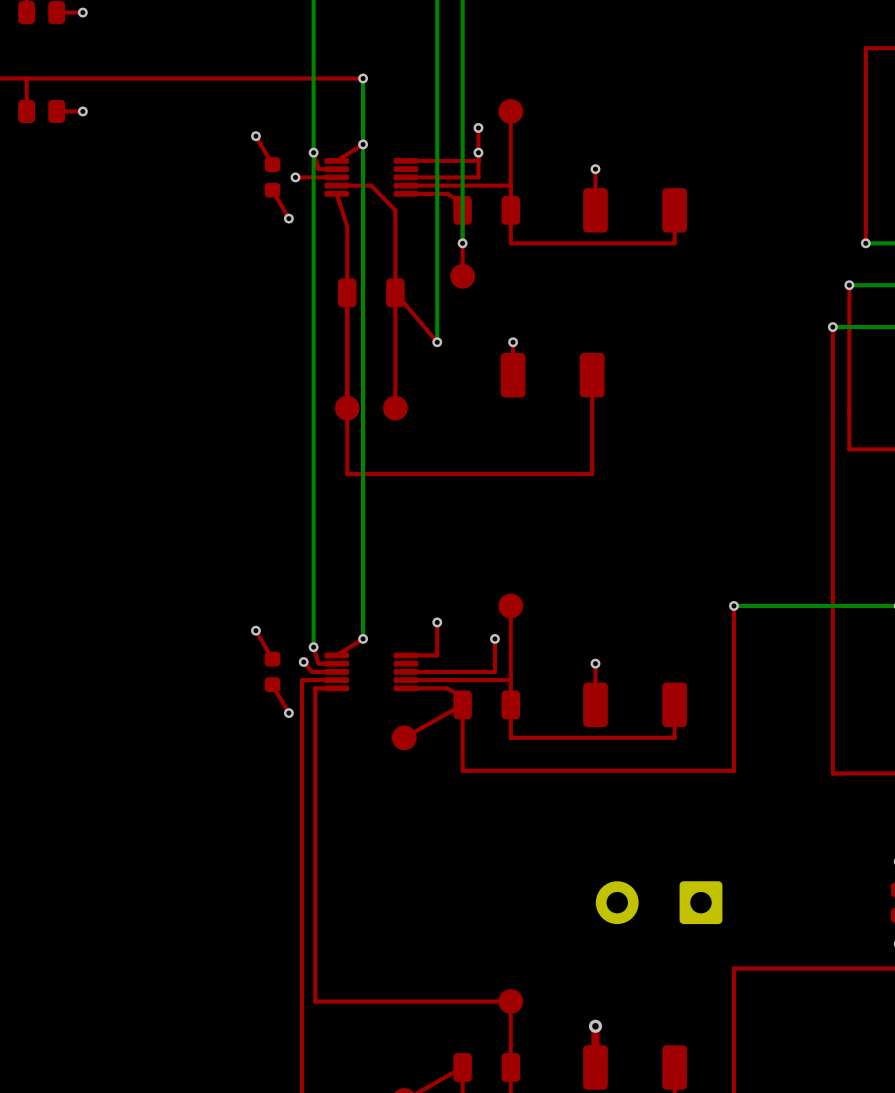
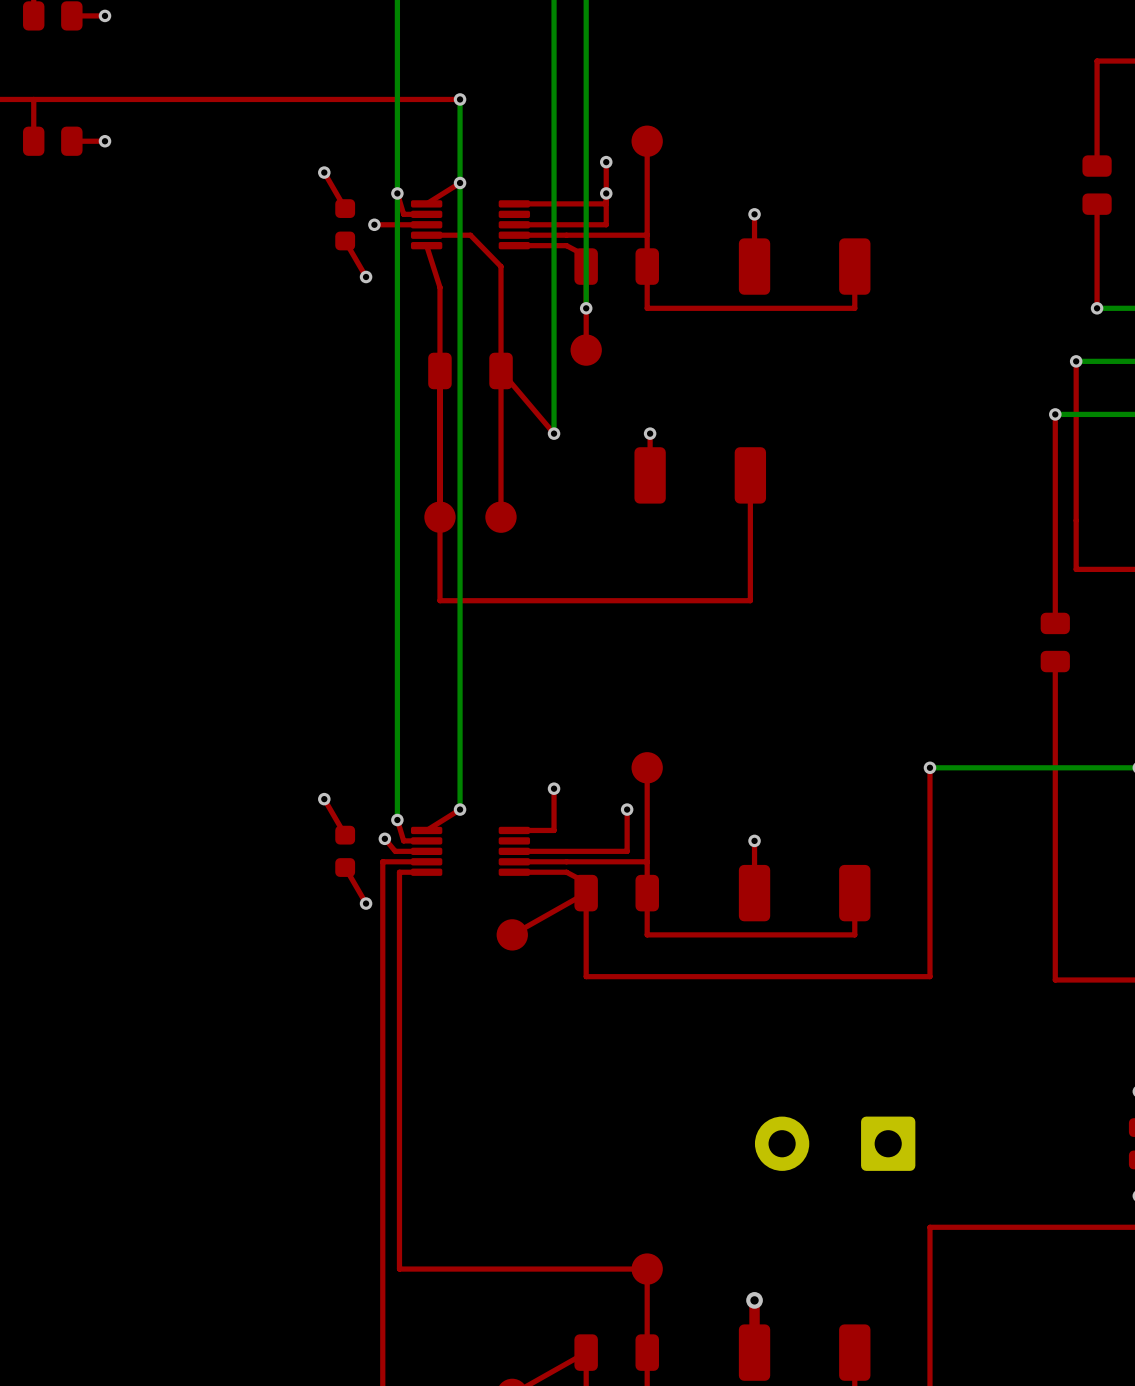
top track: (865, 130) (865, 161) -> none
part: none -> (1097, 185)
top track: (832, 491) (832, 522) -> none
part: none -> (1055, 642)

